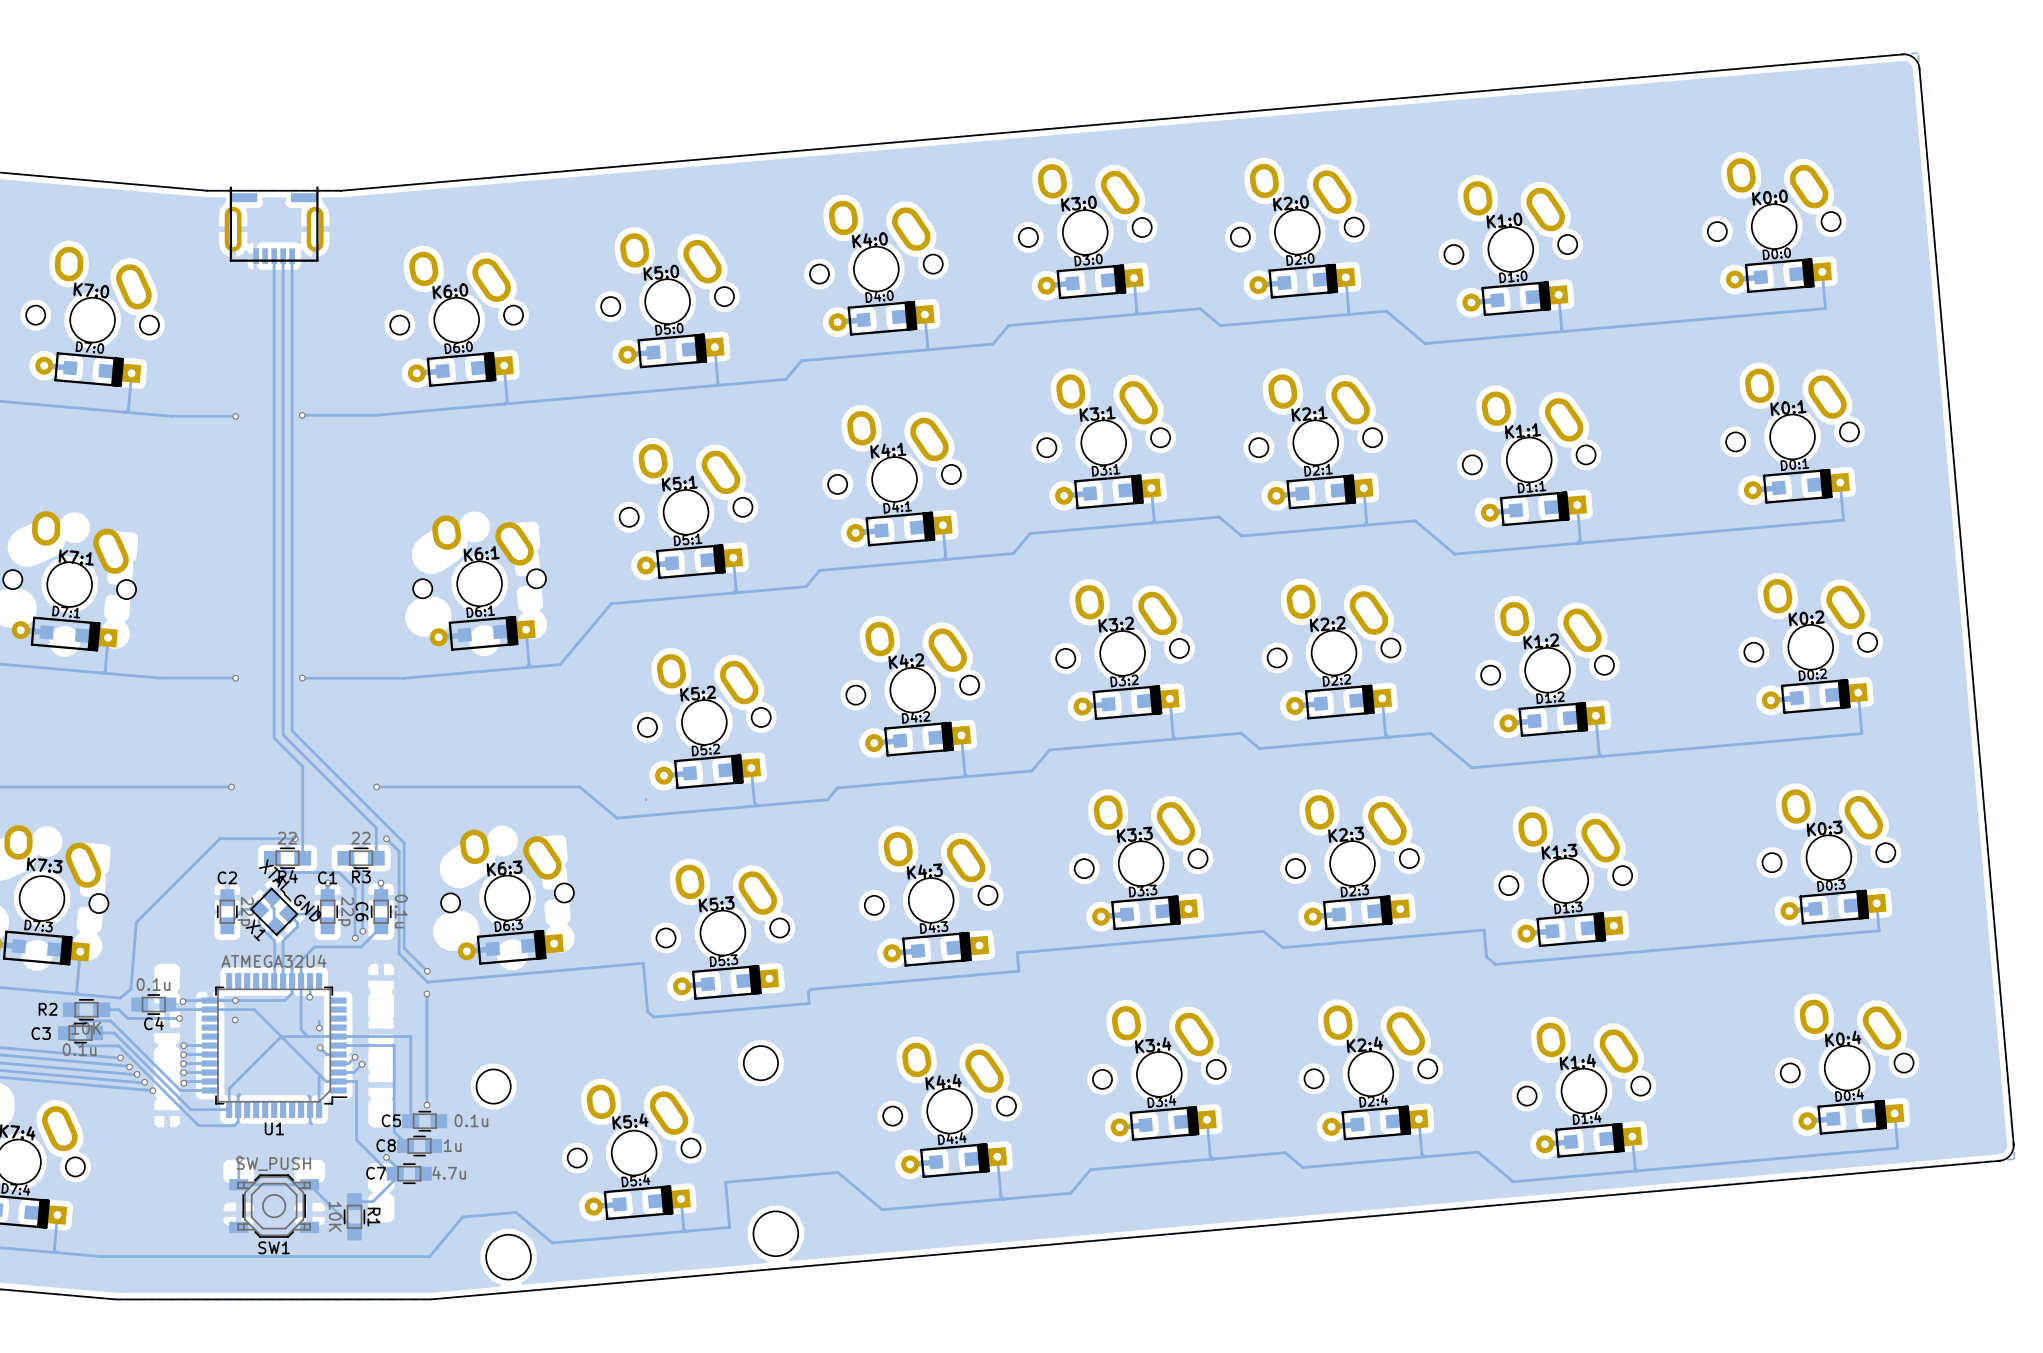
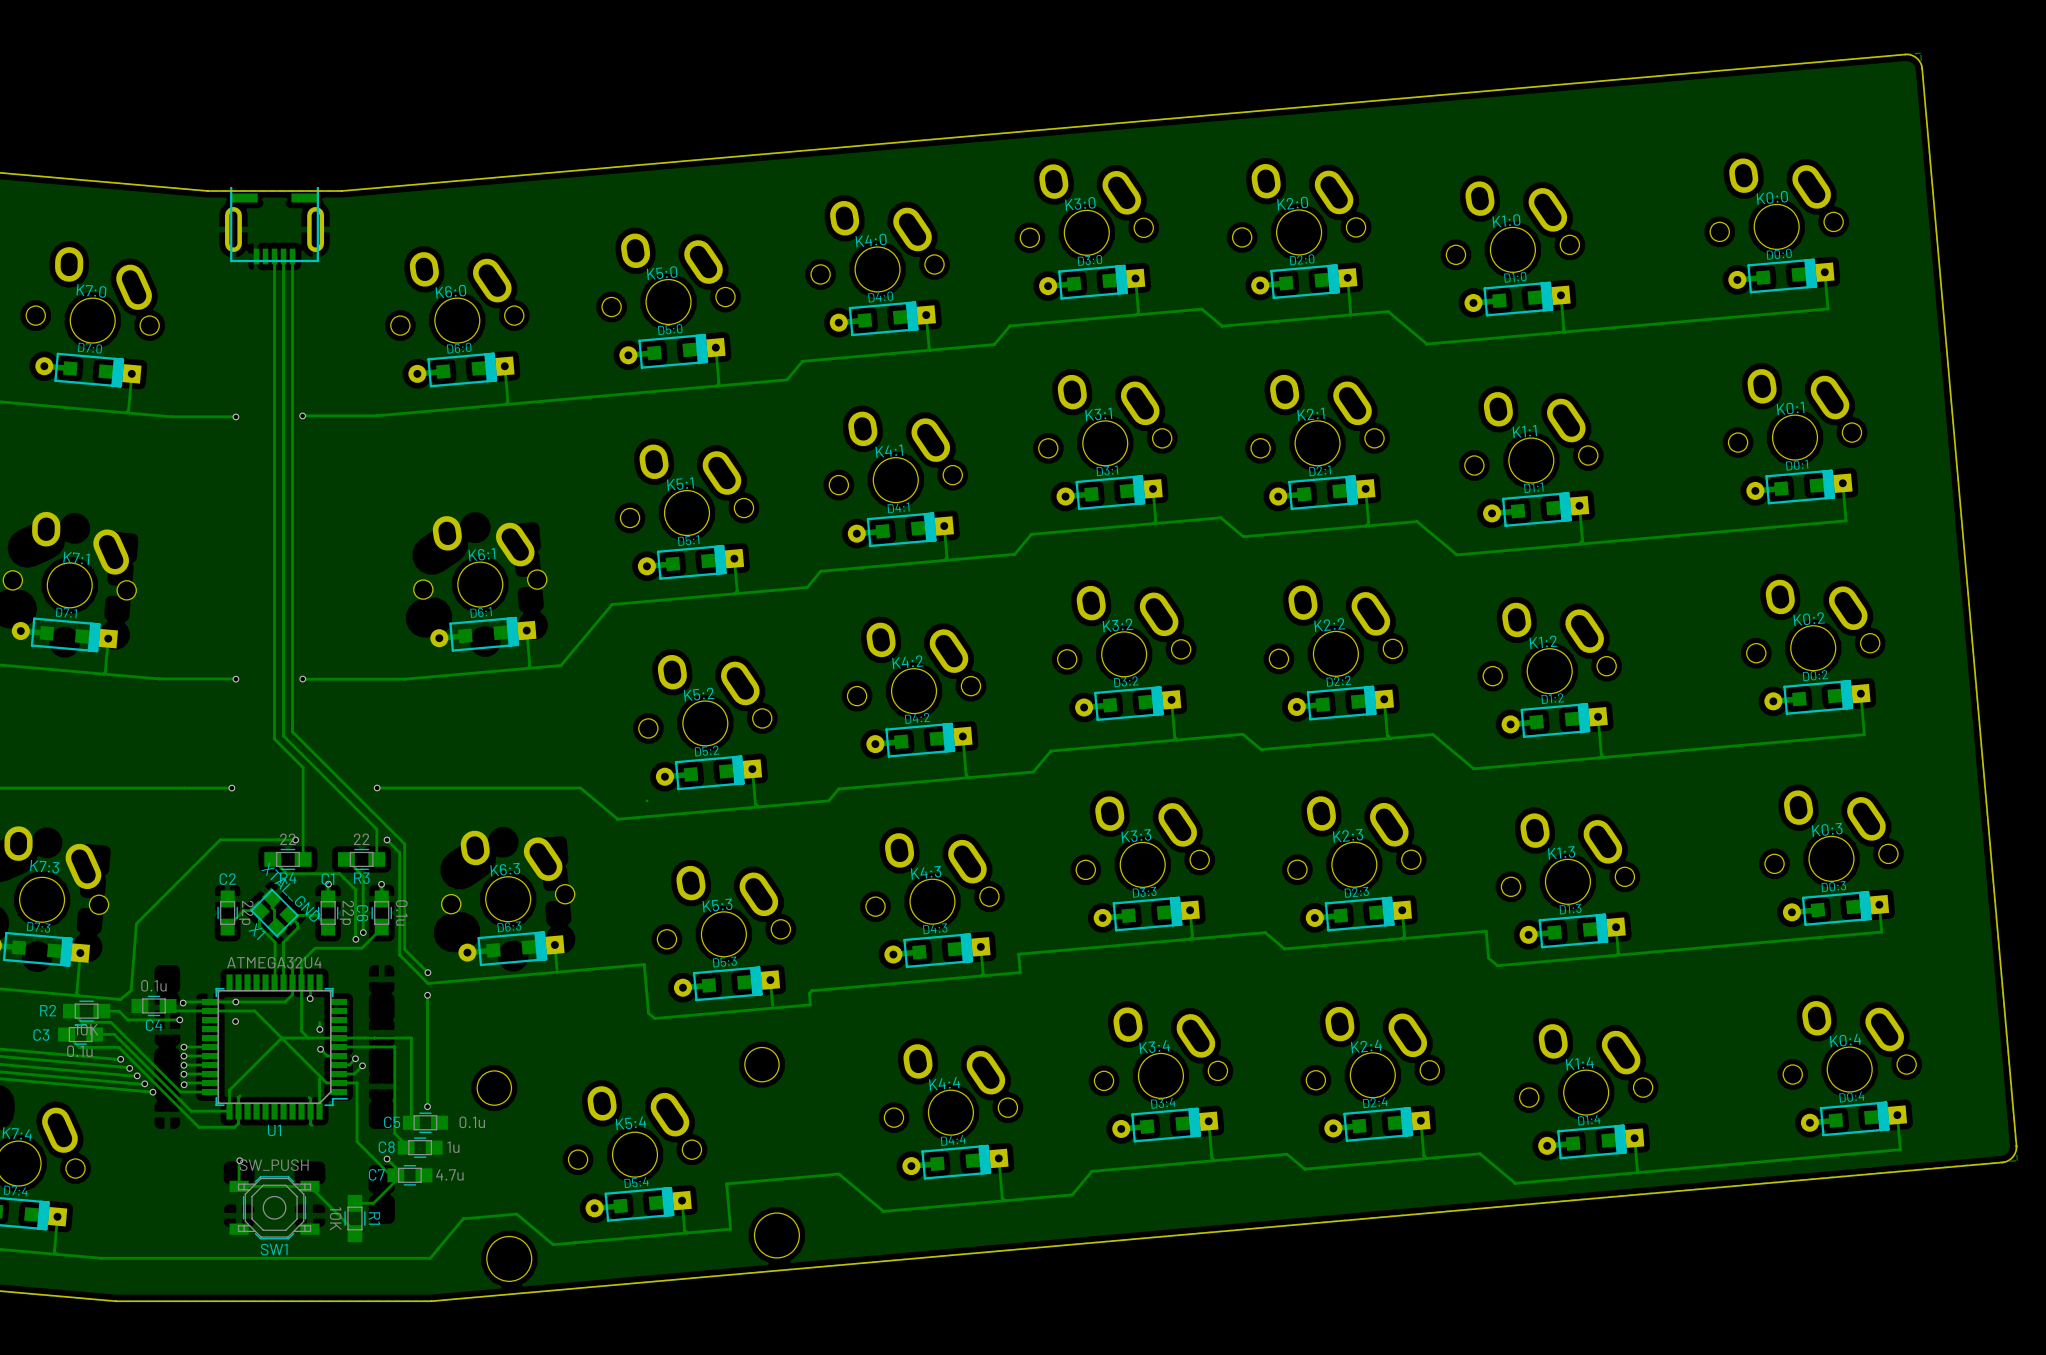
track: none -> (1190, 910) (1192, 936) (1189, 939)
track: none -> (1402, 910) (1404, 936) (1401, 938)
track: none -> (1616, 927) (1618, 952) (1616, 955)
track: none -> (554, 944) (557, 969)
track: none -> (980, 946) (983, 973) (981, 976)
track: none -> (770, 980) (772, 1005)

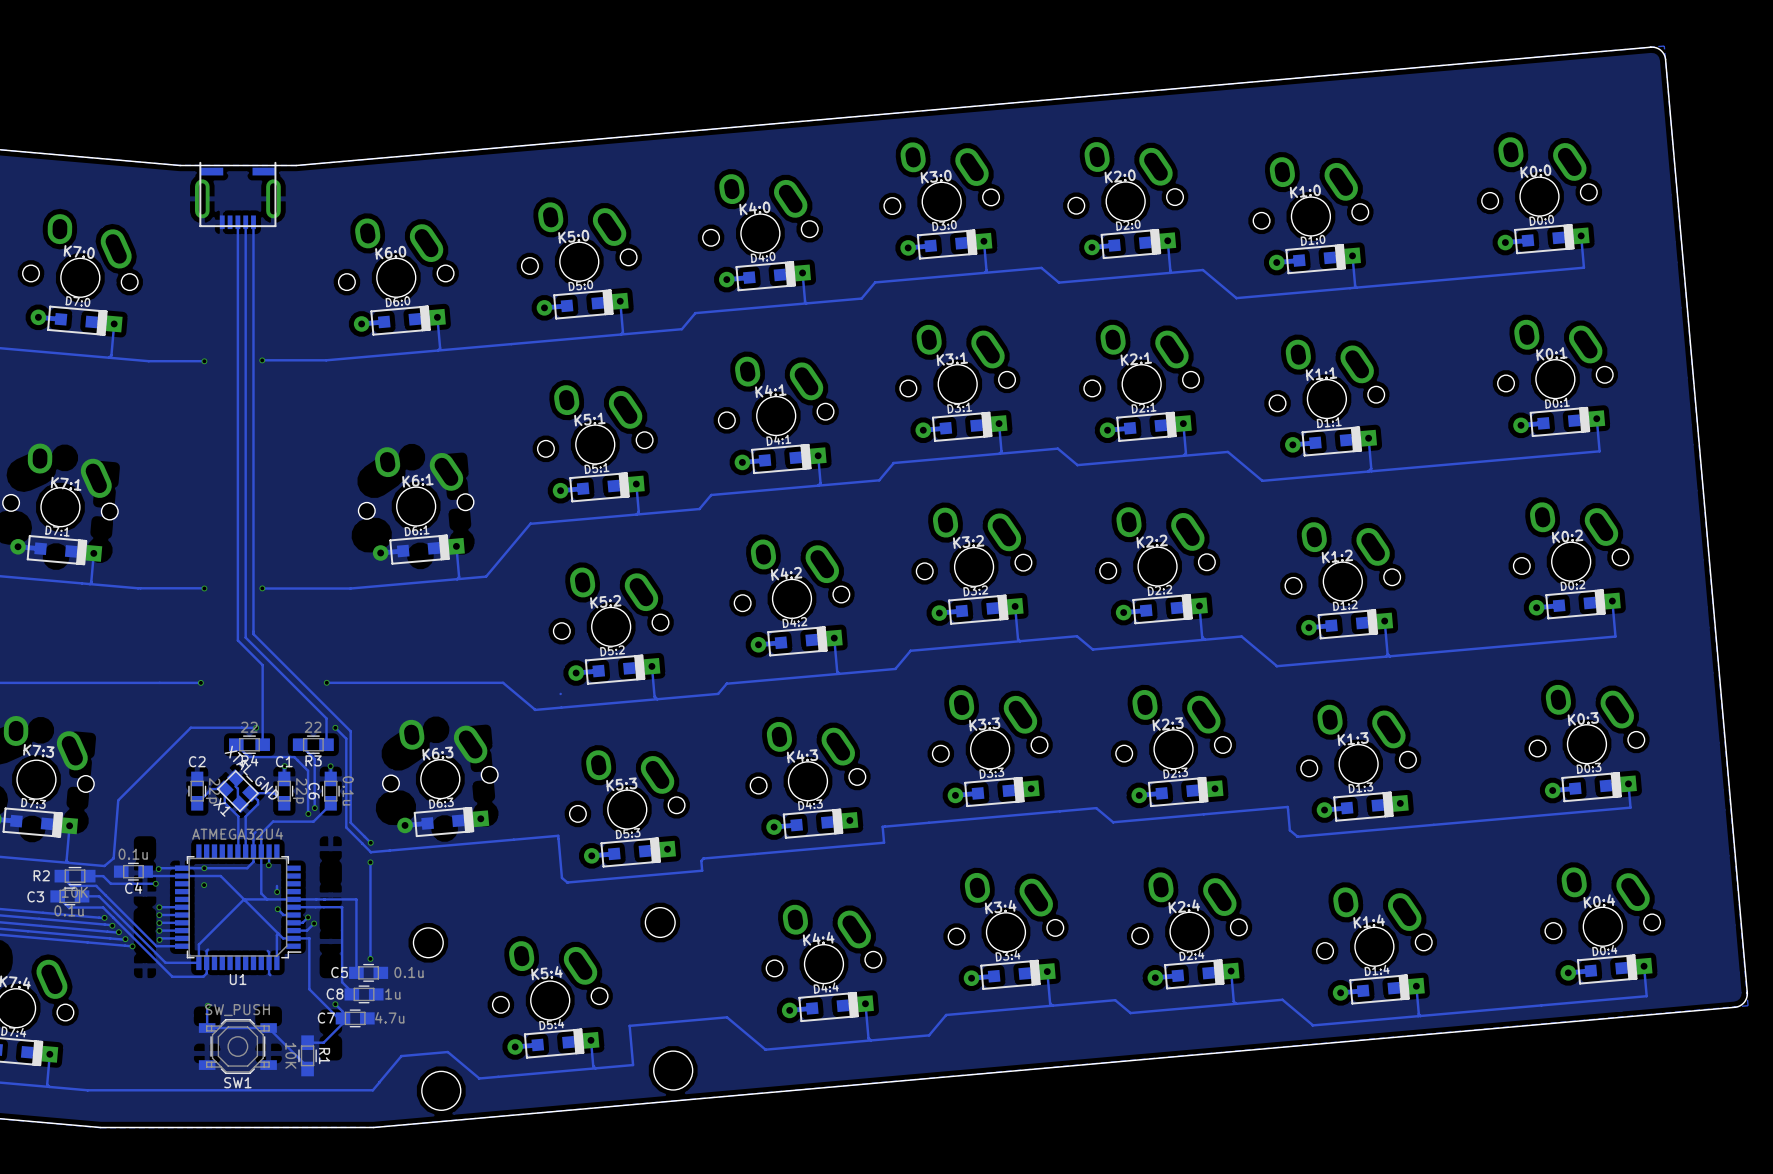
track: (1190, 910) (1192, 936) (1189, 939) -> none
track: (1402, 910) (1404, 936) (1401, 938) -> none
track: (1616, 927) (1618, 952) (1616, 955) -> none
track: (554, 944) (557, 969) -> none
track: (980, 946) (983, 973) (981, 976) -> none
track: (770, 980) (772, 1005) -> none

